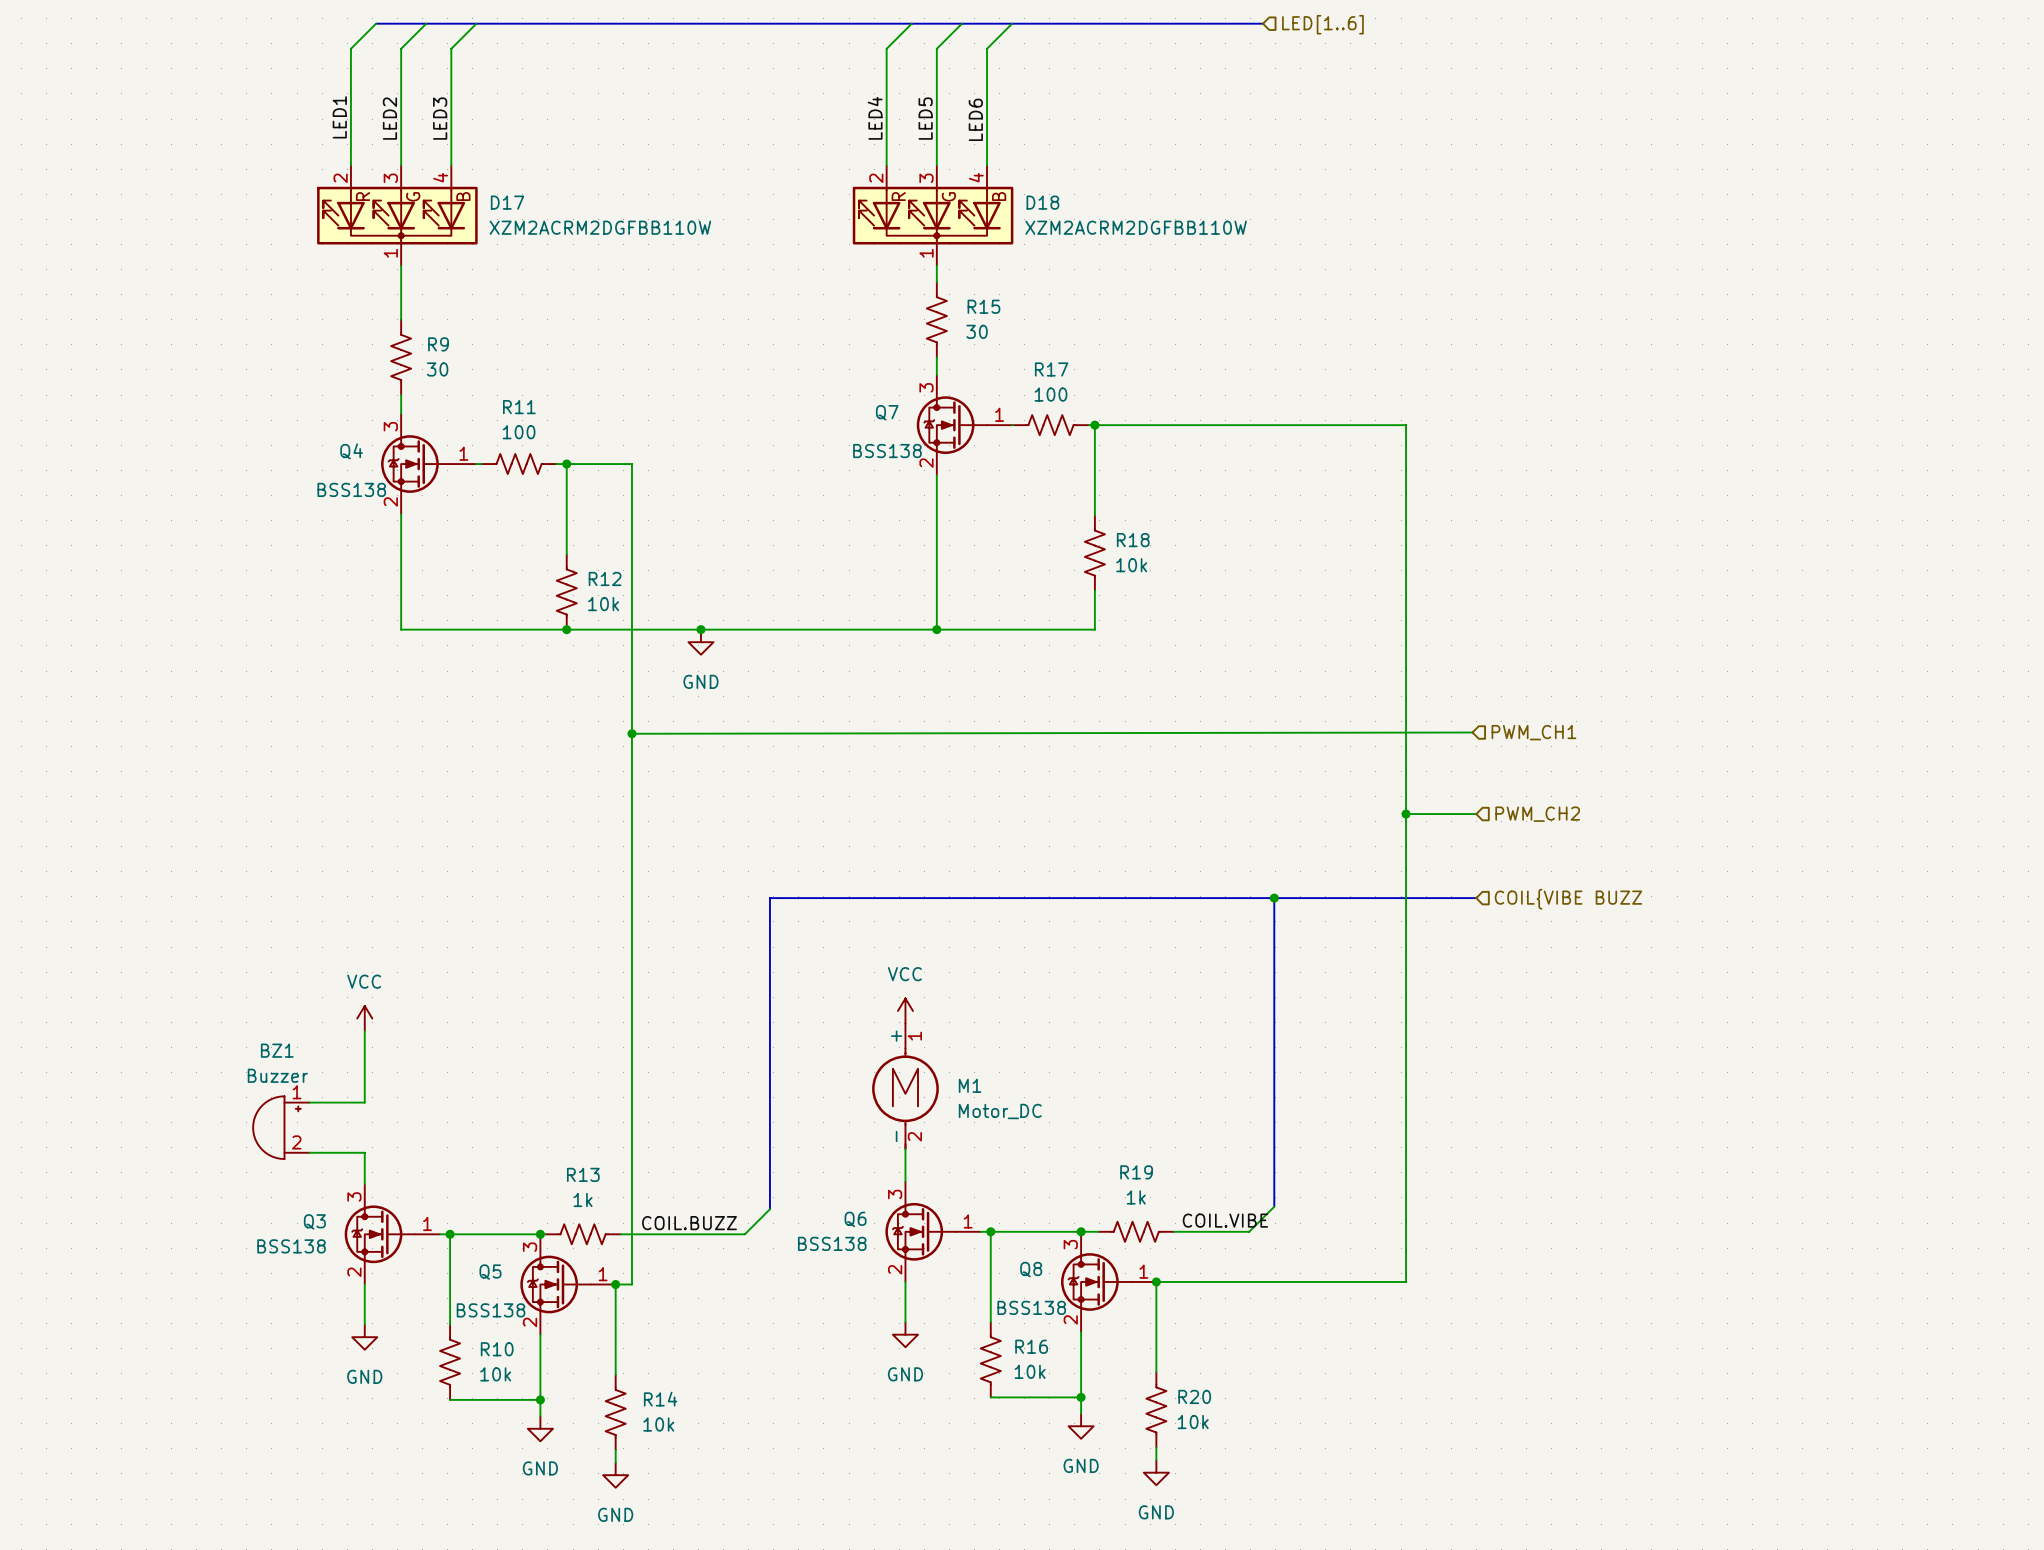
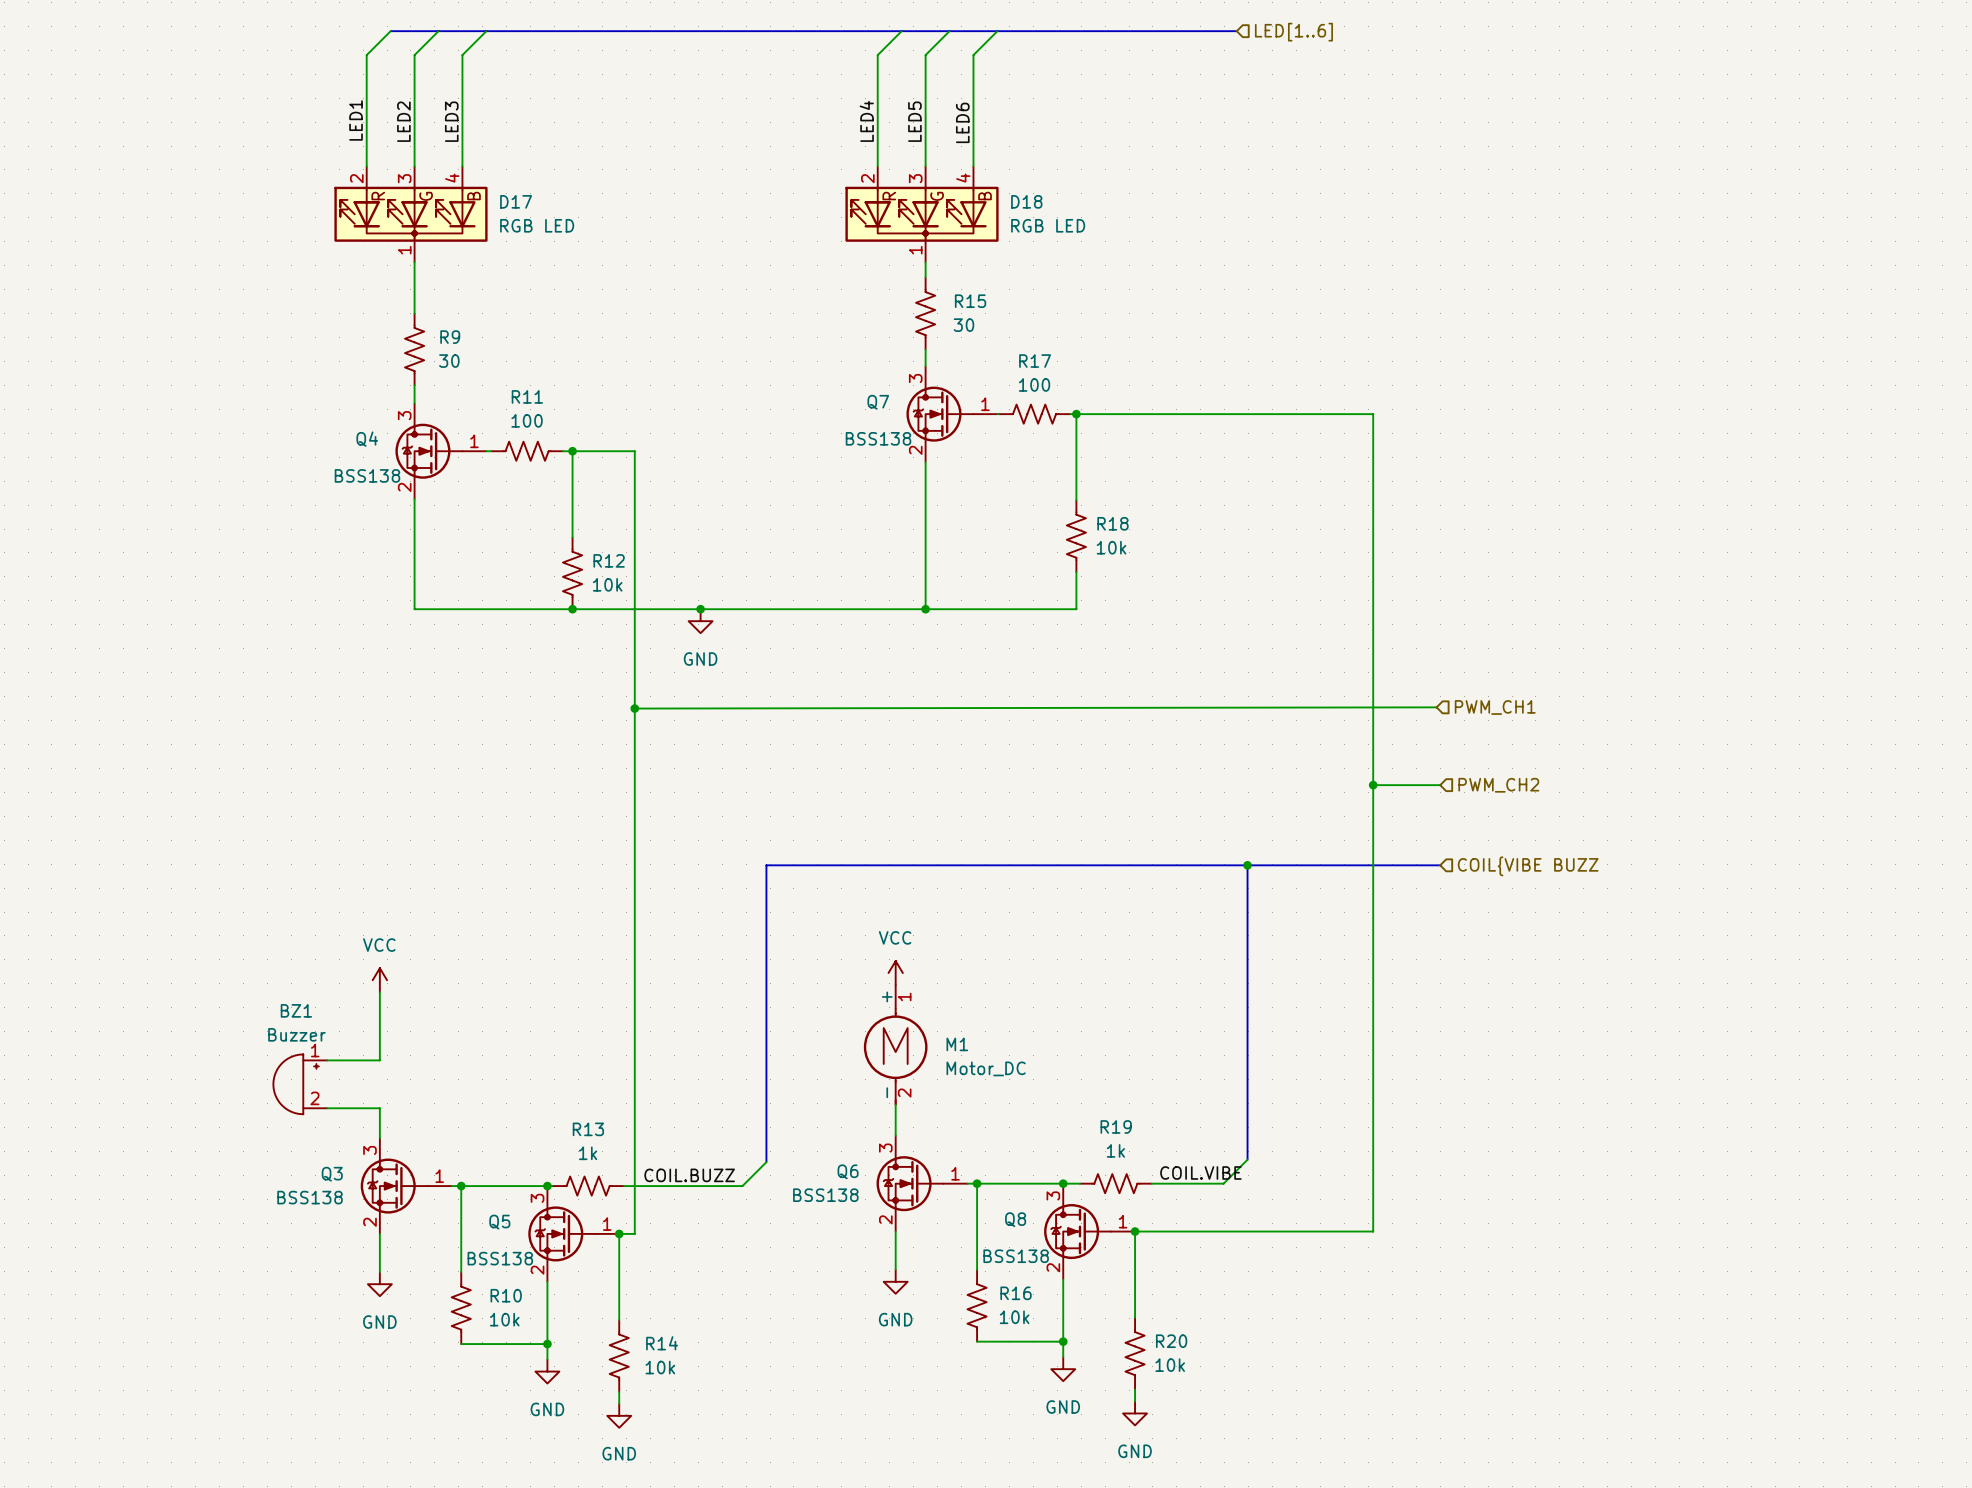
D17 value: XZM2ACRM2DGFBB110W (600, 227) -> RGB LED (537, 225)
D18 value: XZM2ACRM2DGFBB110W (1136, 227) -> RGB LED (1048, 225)

